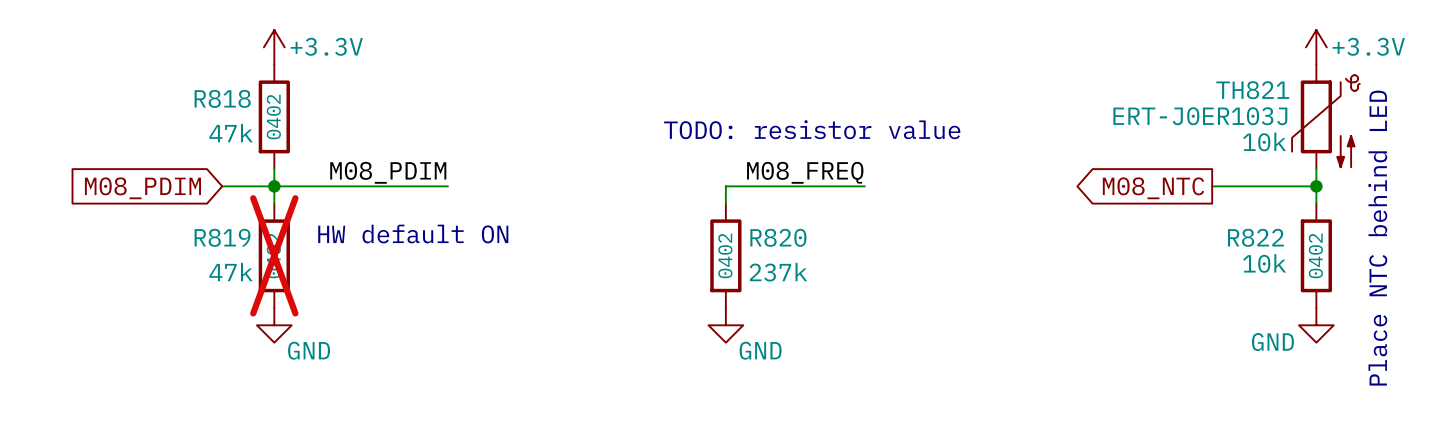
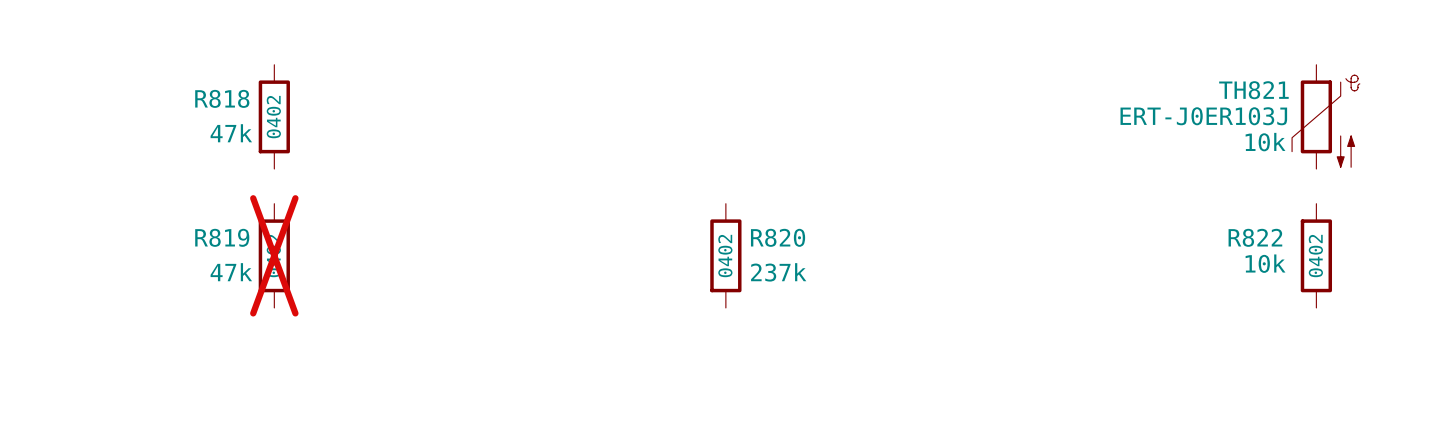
power symbol: +3.3V (274, 47) -> none
power symbol: +3.3V (1316, 47) -> none
text: TODO: resistor value (812, 129) -> none
wire: (274, 168) (274, 203) -> none
wire: (1316, 168) (1316, 203) -> none
label: M08_PDIM (388, 172) -> none
label: M08_FREQ (805, 172) -> none
wire: (222, 186) (448, 186) -> none
junction: (274, 186) -> none
wire: (864, 186) (725, 186) (725, 203) -> none
wire: (1212, 186) (1316, 186) -> none
junction: (1316, 186) -> none
global label: M08_PDIM (142, 188) -> none
global label: M08_NTC (1153, 188) -> none
text: HW default ON (413, 234) -> none
text: Place NTC behind LED (1377, 238) -> none
power symbol: GND (274, 325) -> none
power symbol: GND (725, 325) -> none
power symbol: GND (1316, 325) -> none

